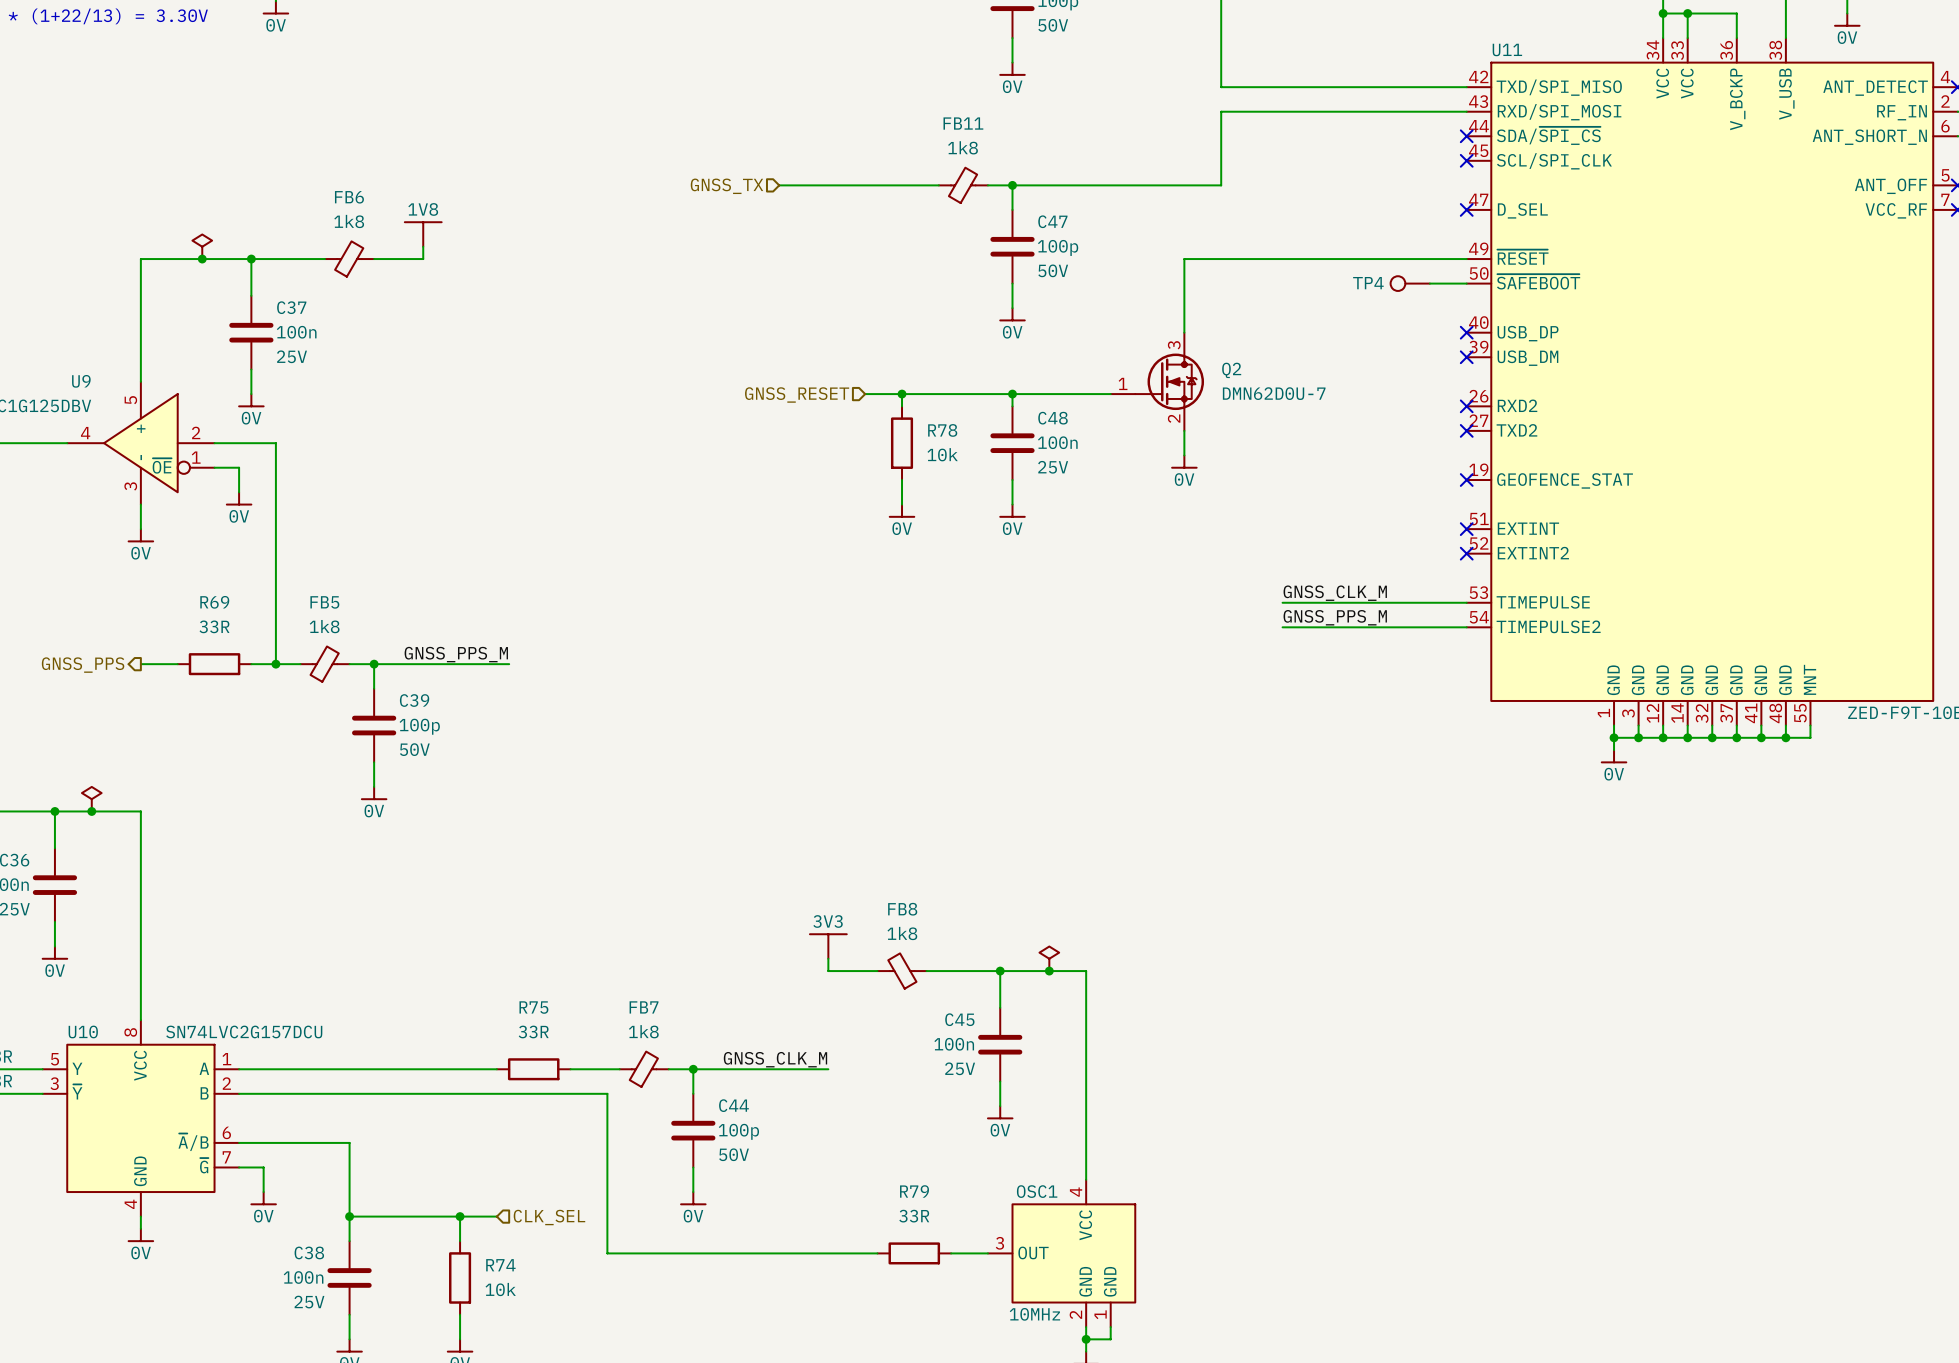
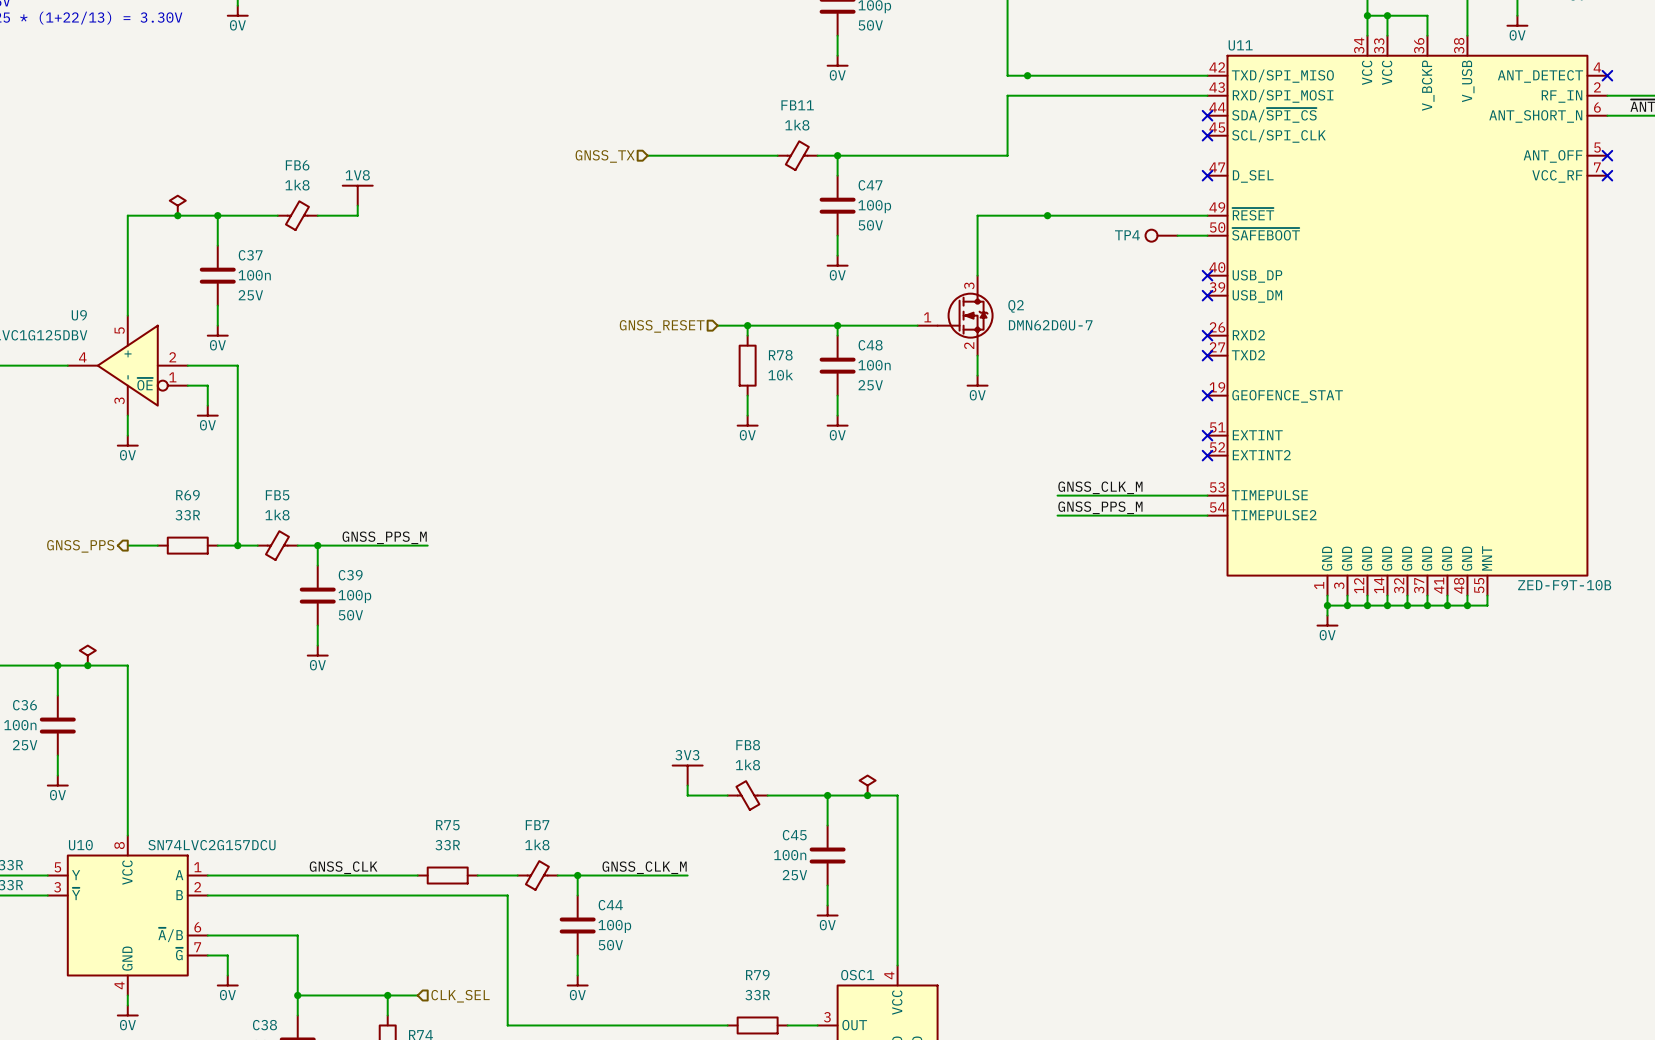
junction: none -> (1027, 75)
junction: none -> (1047, 215)
label: none -> GNSS_CLK (343, 867)

